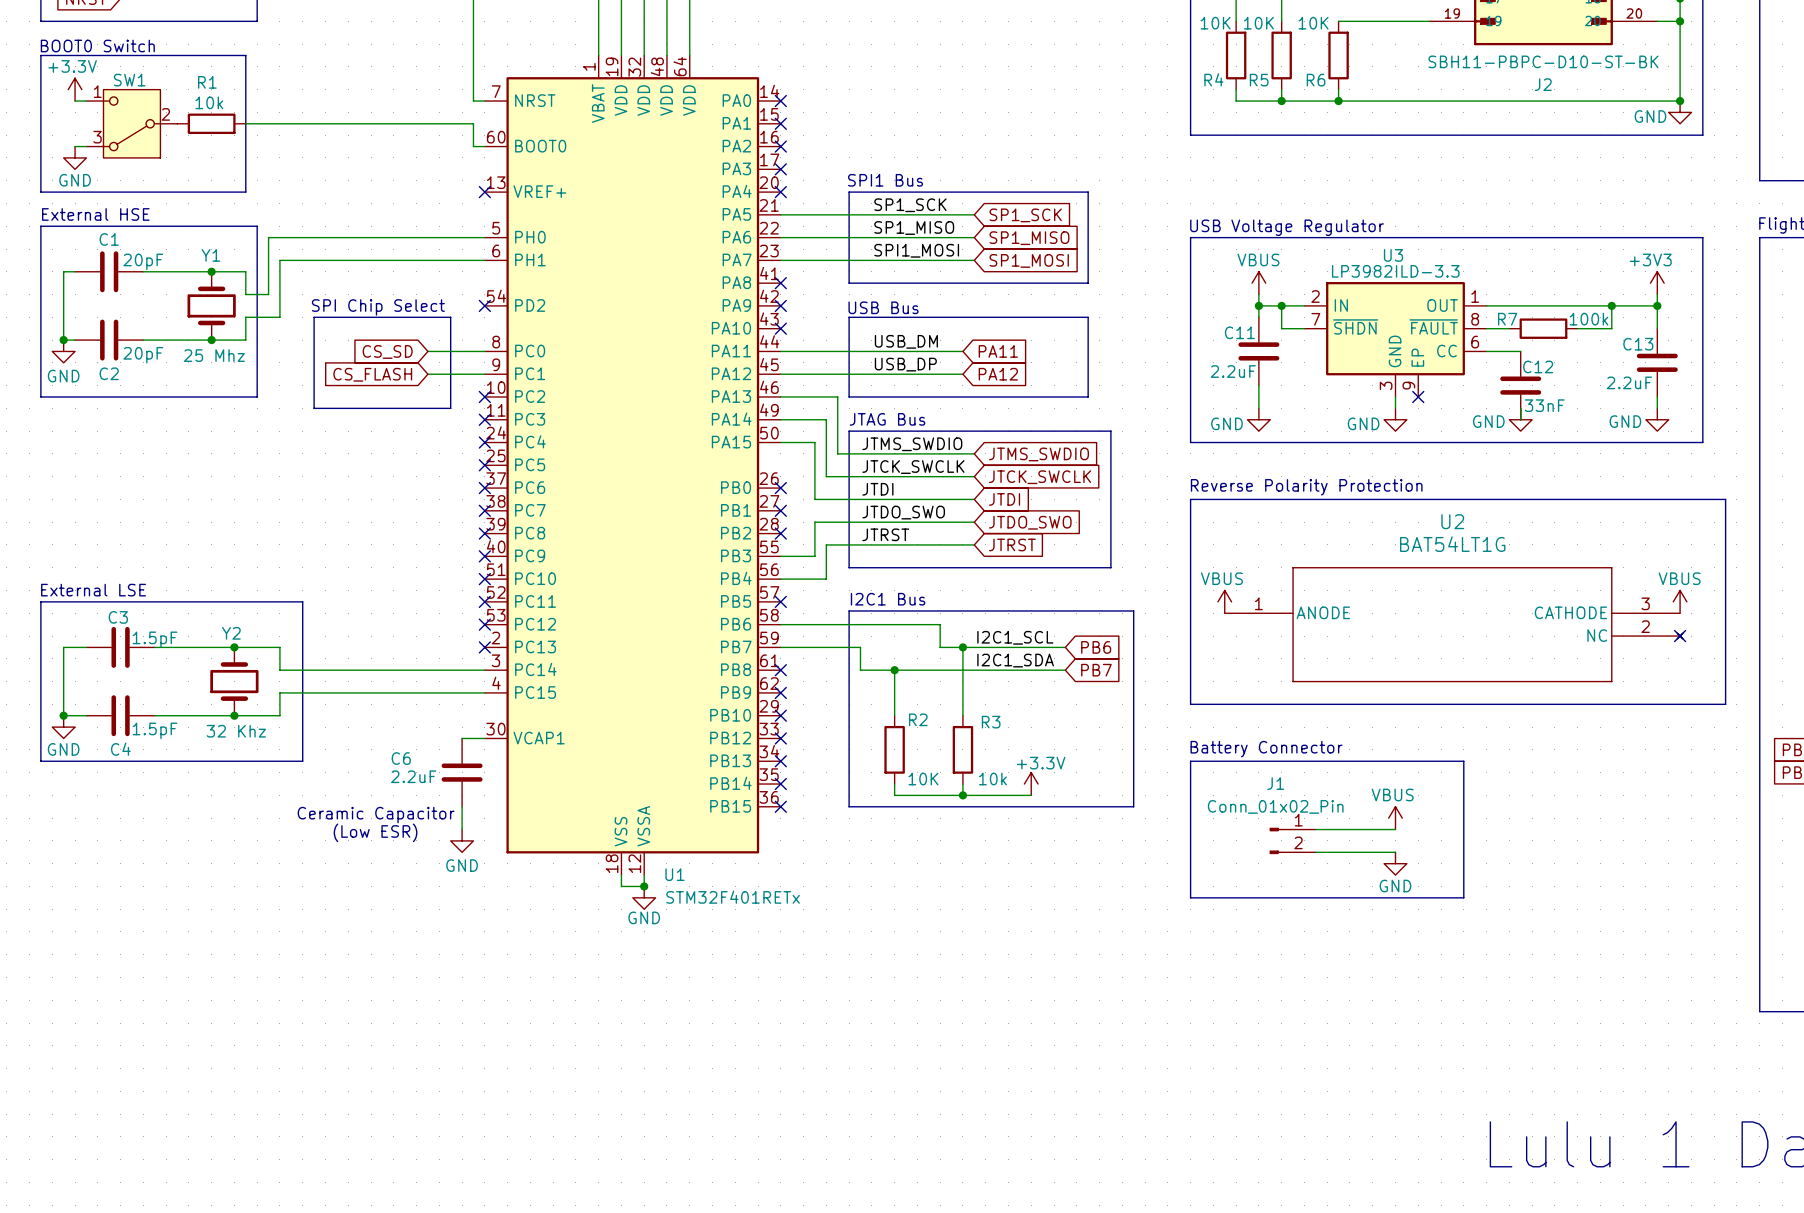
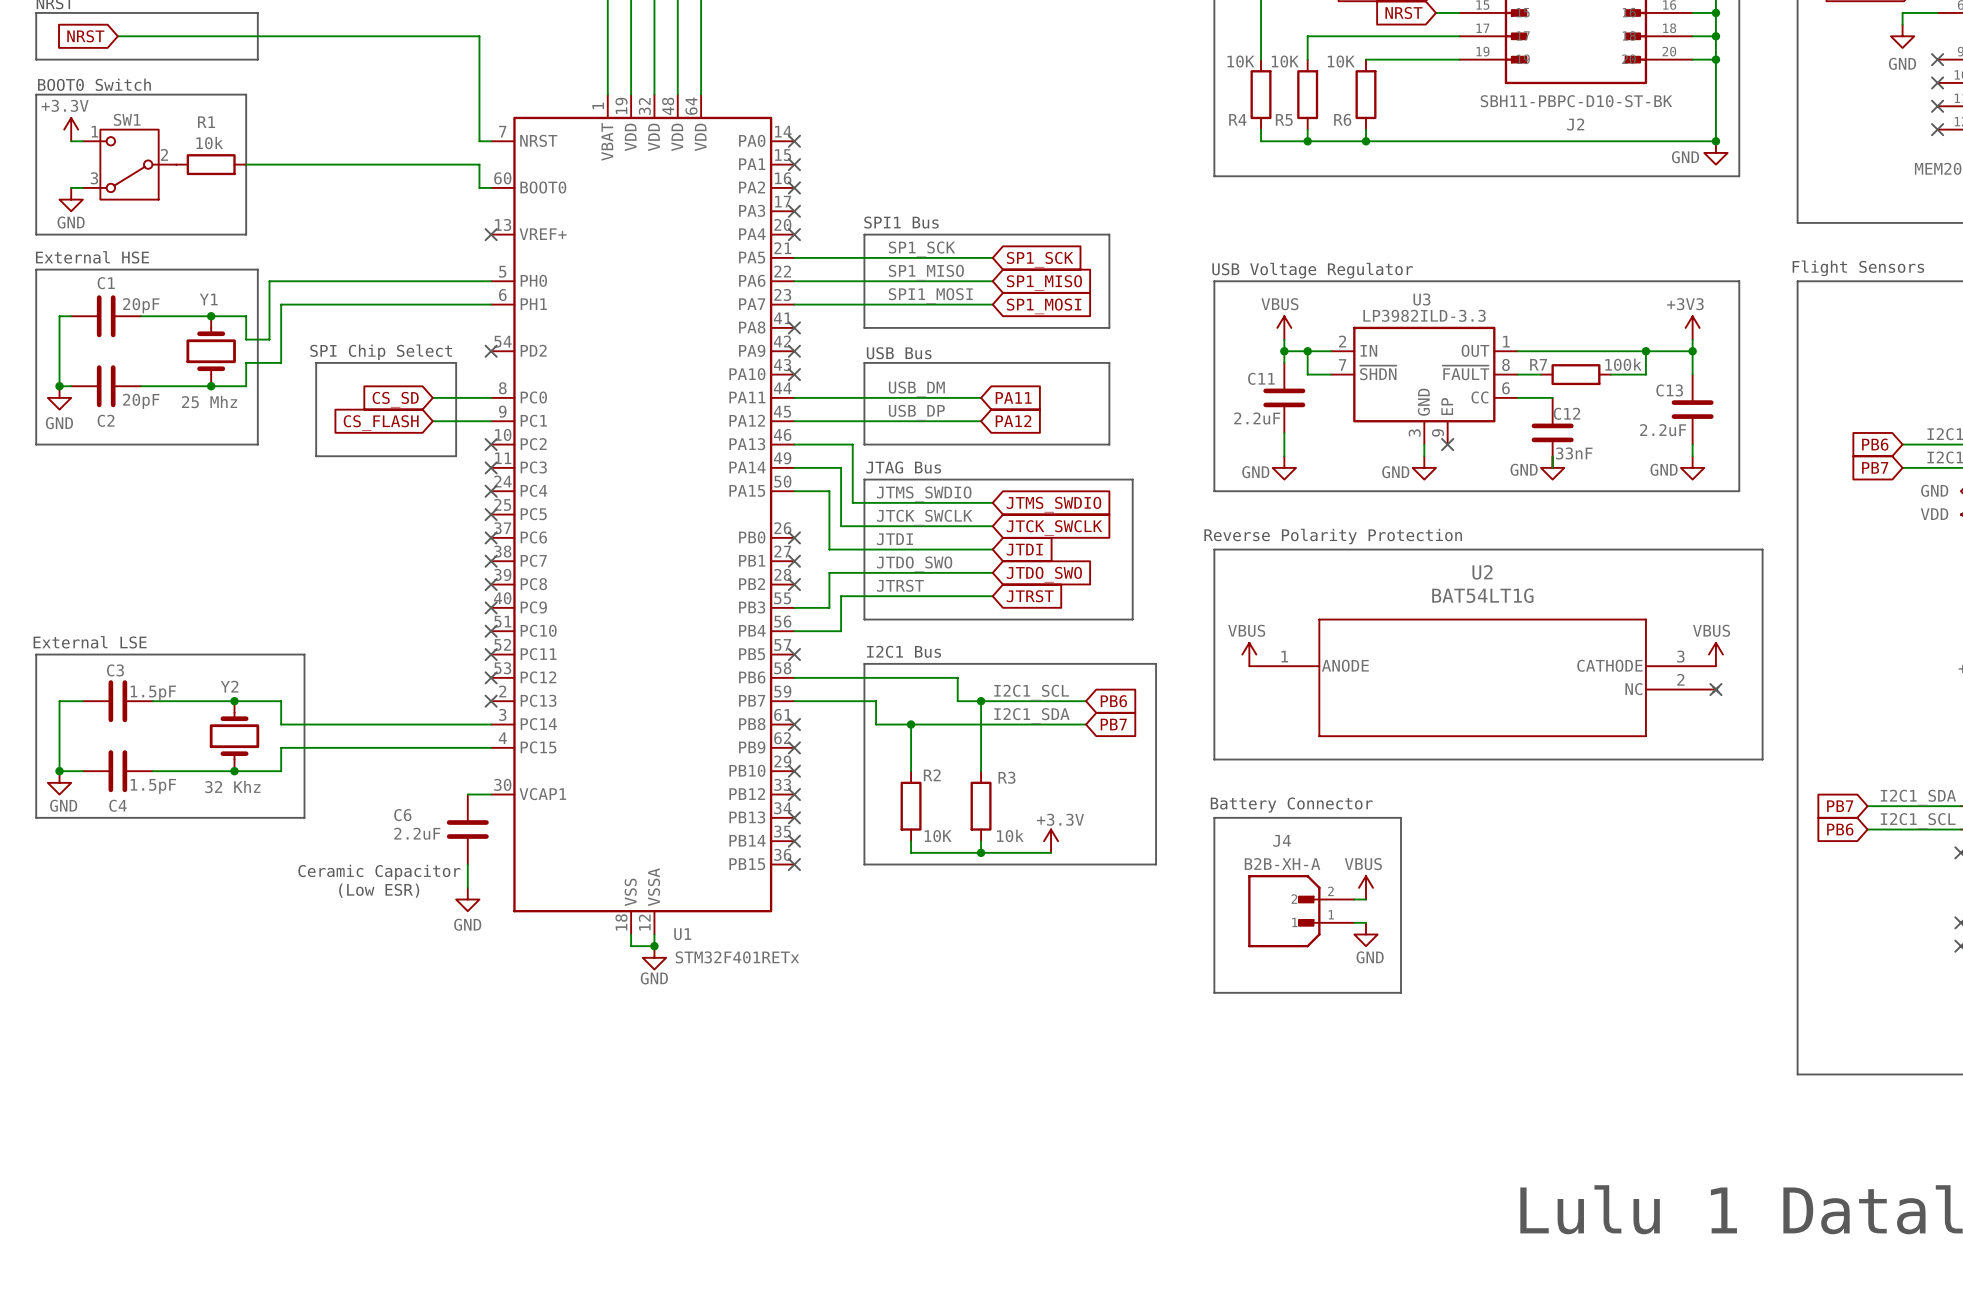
line: (1372, 761) (1463, 761) (1463, 897) (1190, 897) -> (1400, 817) (1400, 992) (1214, 992) (1214, 957)
power symbol position: VBUS (1395, 818) -> VBUS (1366, 887)
wire: (1315, 829) (1395, 829) -> none
J1: Conn_01x02_Pin (1292, 840) -> none
wire: none -> (1354, 899) (1366, 899)
J4: none -> B2B-XH-A (1301, 911)
wire: (1315, 852) (1395, 852) -> none
wire: none -> (1354, 922) (1366, 922)
power symbol position: GND (1395, 863) -> GND (1366, 934)

